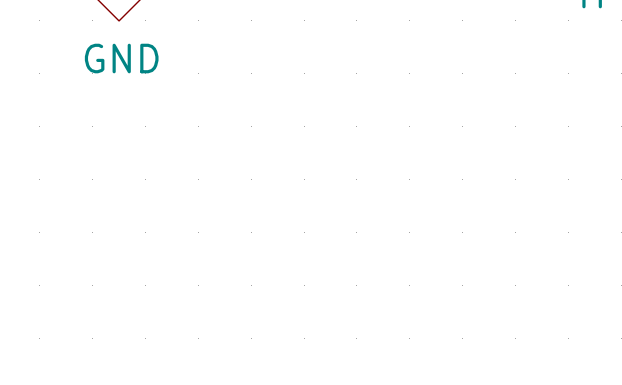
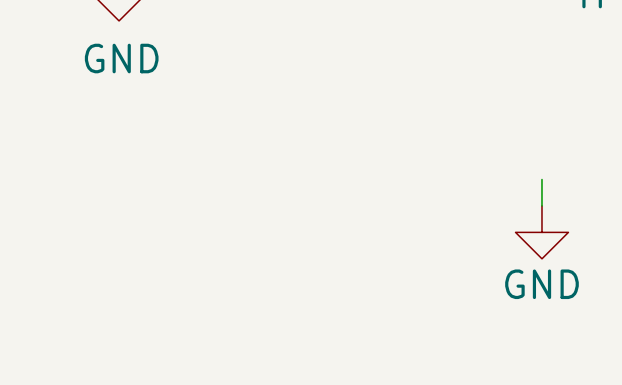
wire: none -> (541, 179) (541, 205)
power symbol: none -> GND (541, 232)

